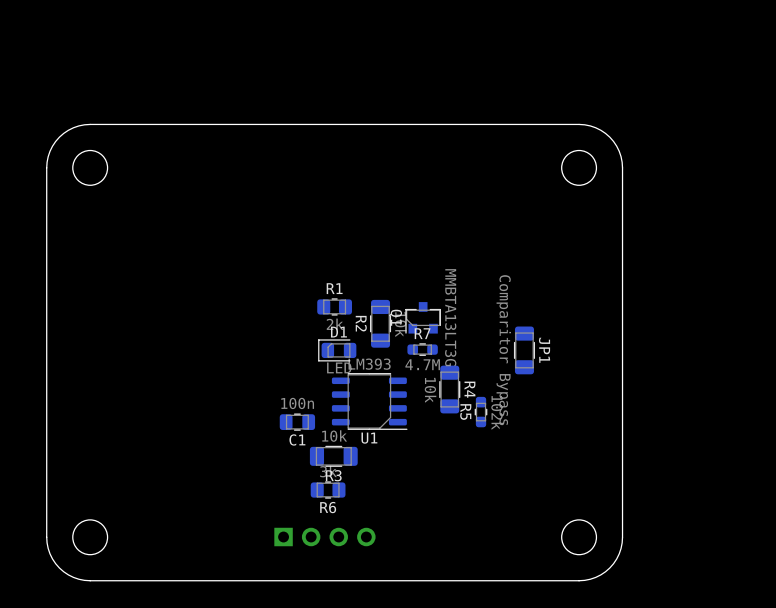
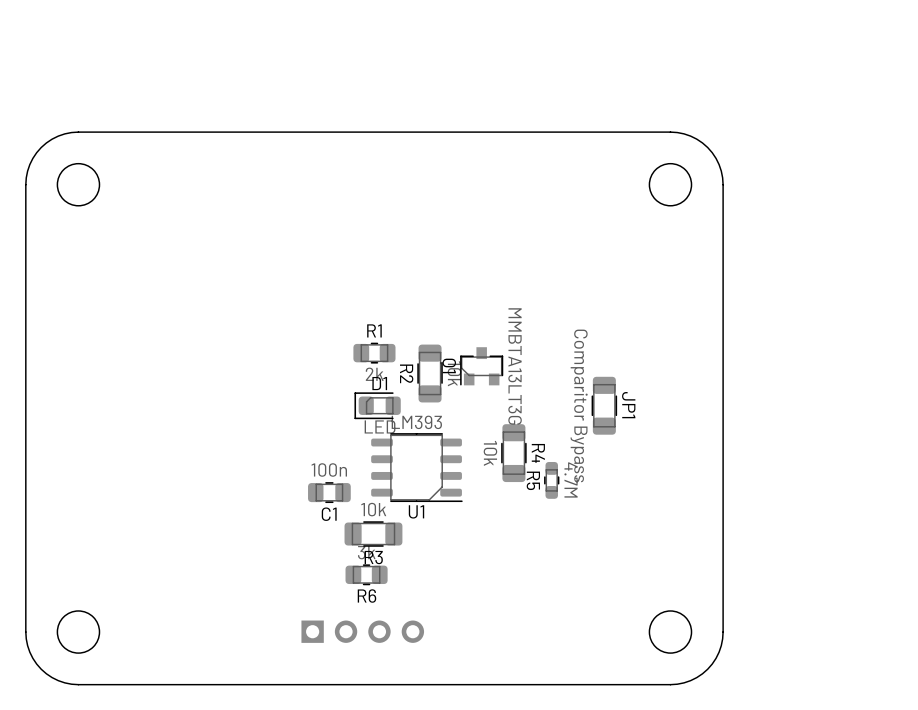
R7: 4.7M (422, 349) -> none
R5 value: 102k (497, 412) -> 4.7M (571, 479)

